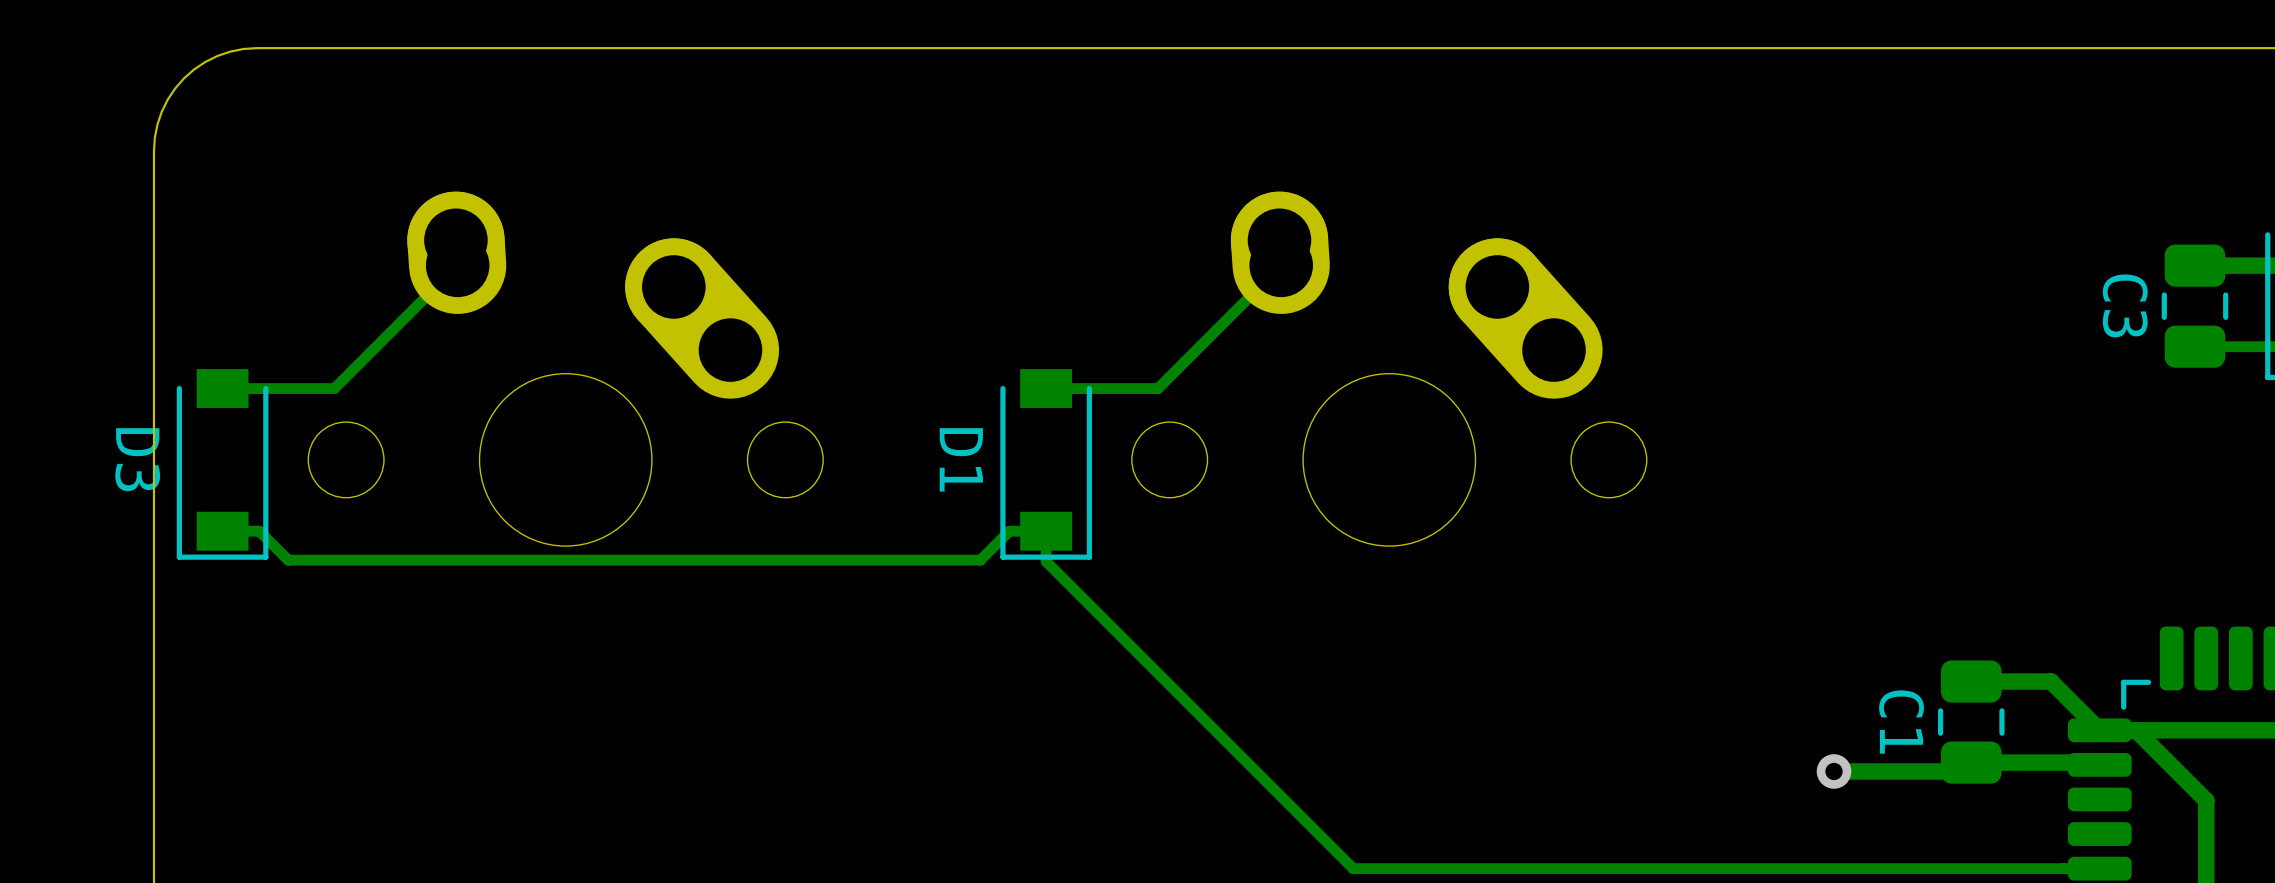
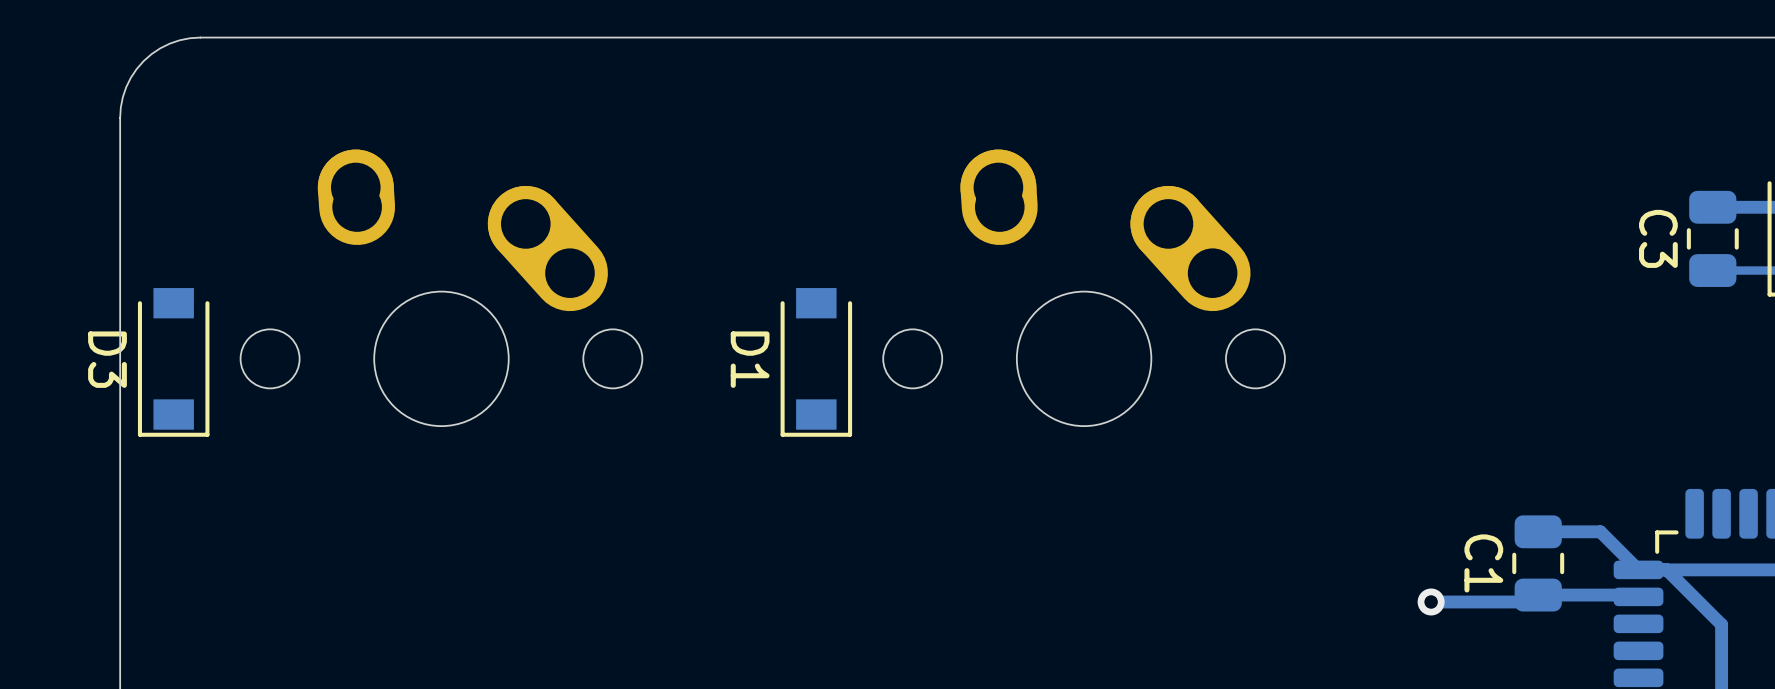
track: (457, 265) (334, 388) (222, 388) -> none
track: (1281, 265) (1158, 388) (1046, 388) -> none
track: (222, 531) (259, 531) (288, 560) (980, 560) (1009, 531) (1046, 531) (1046, 561) (1353, 868) (2099, 868) -> none

